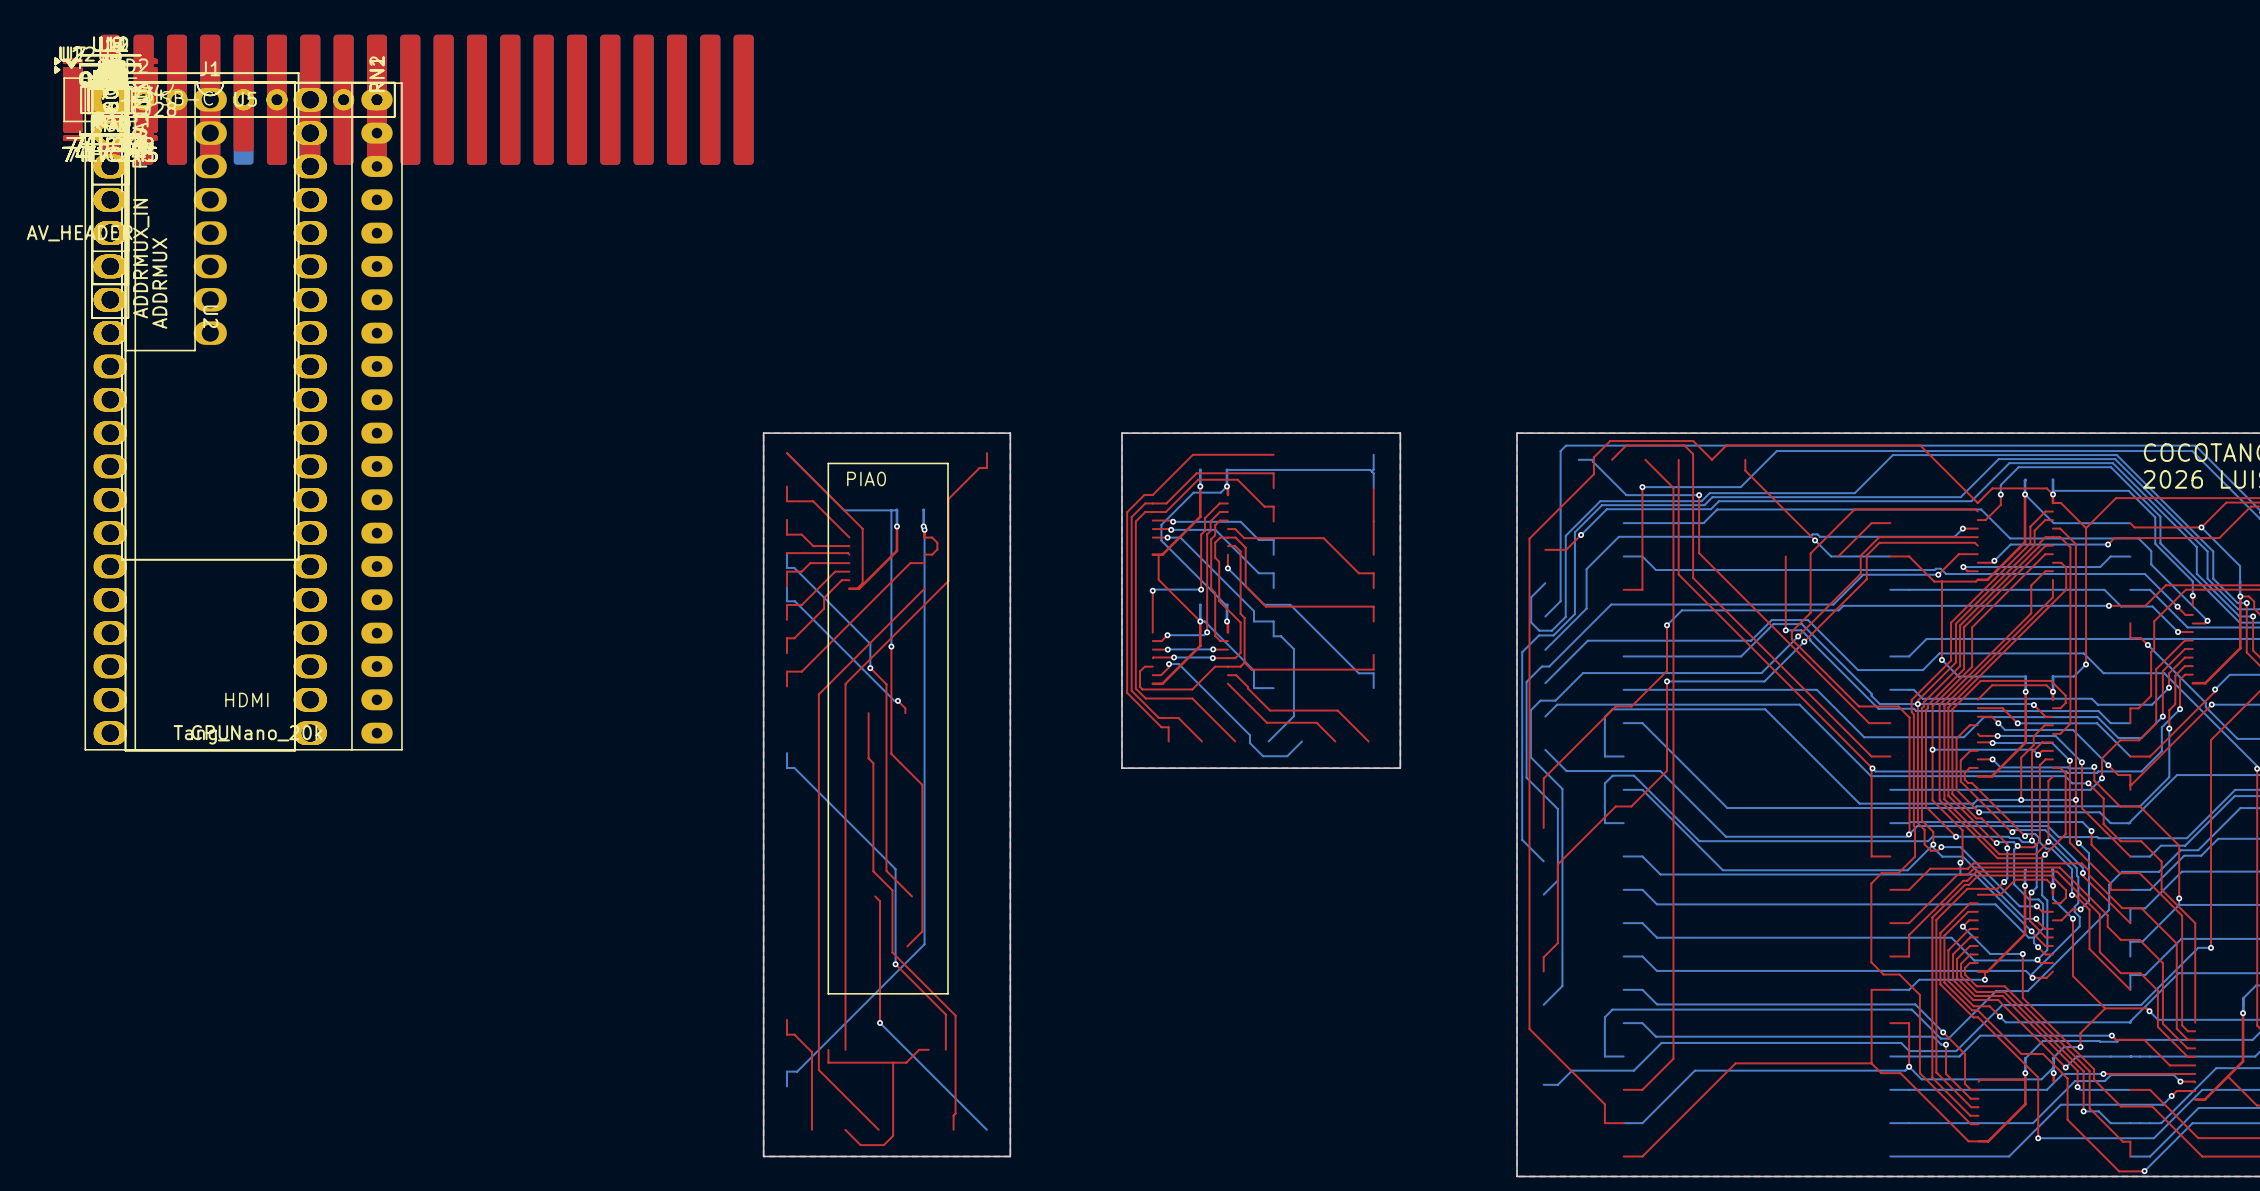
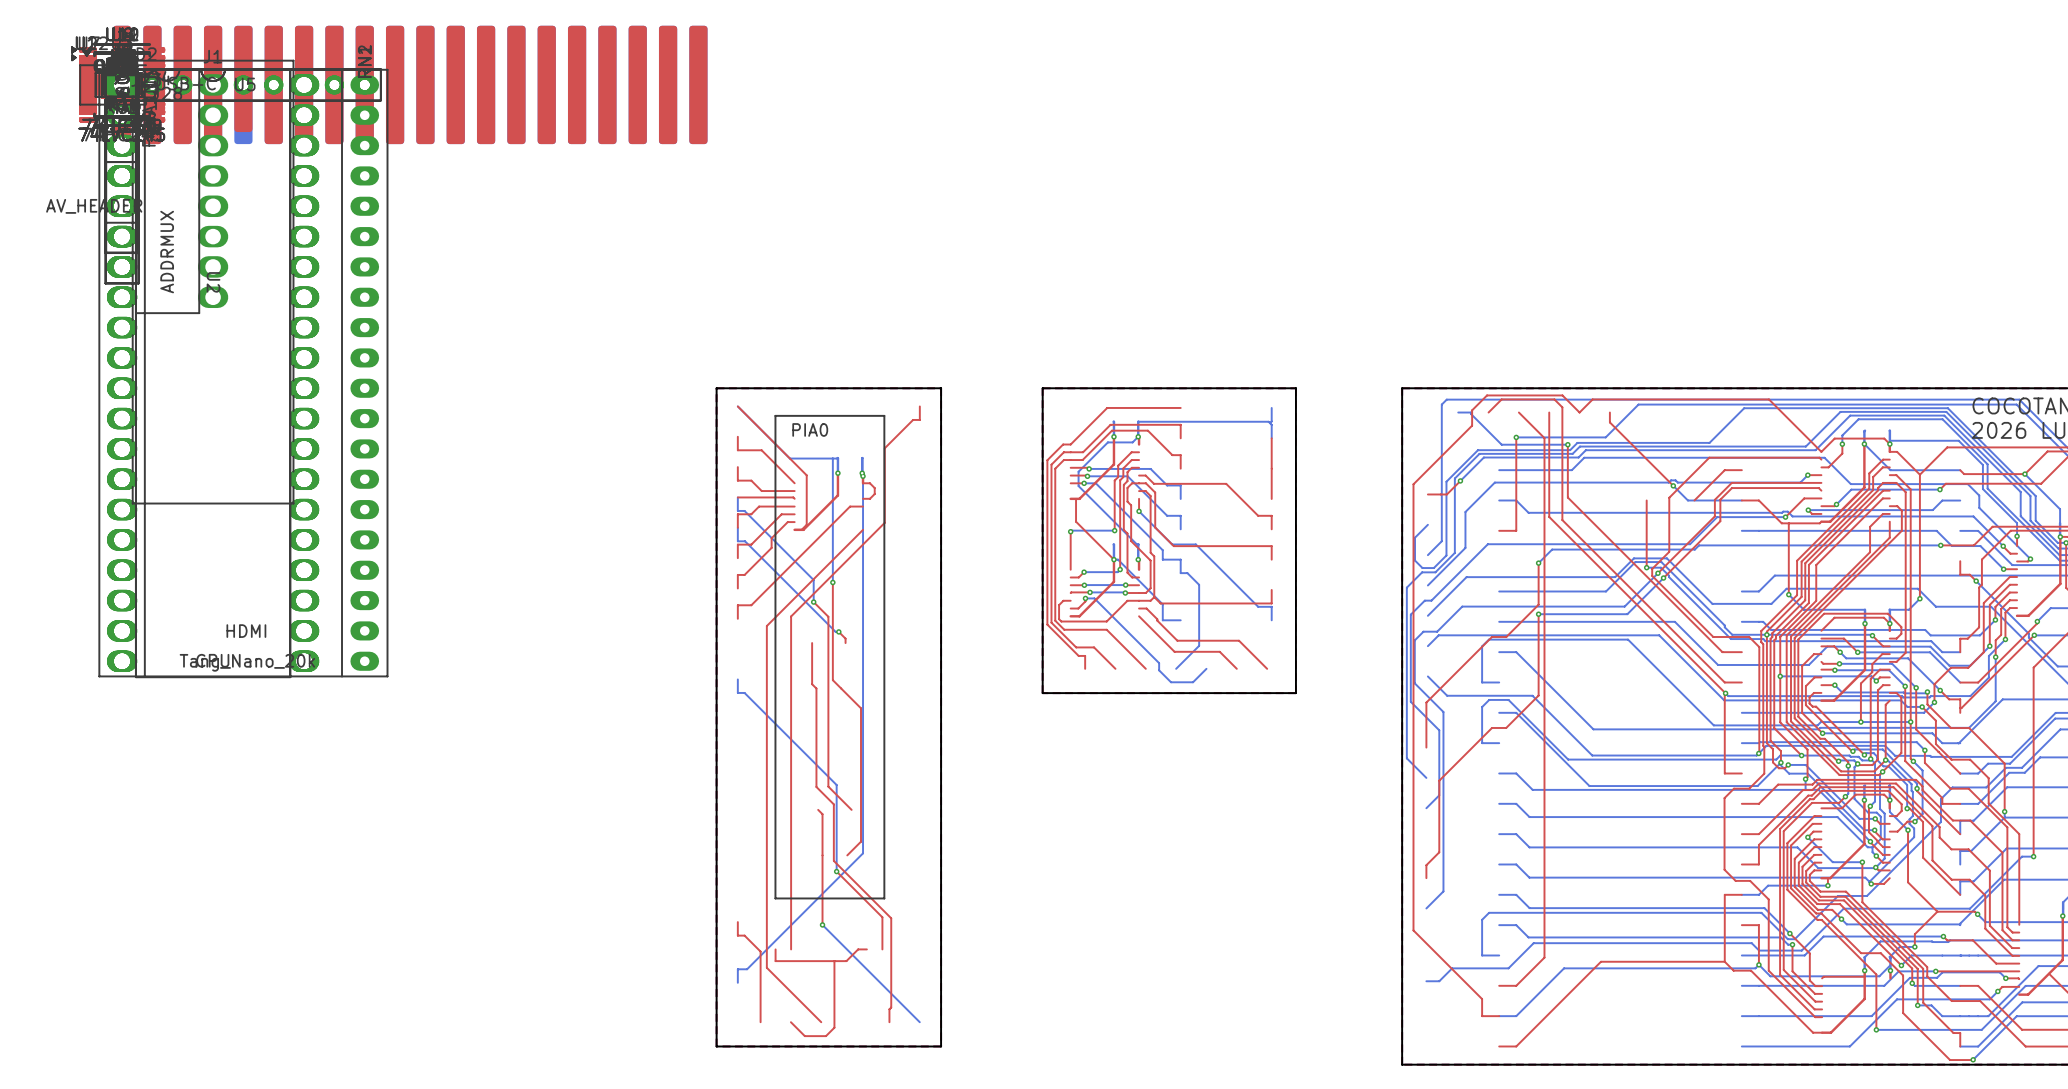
part value: ADDRMUX_IN (141, 258) -> none

